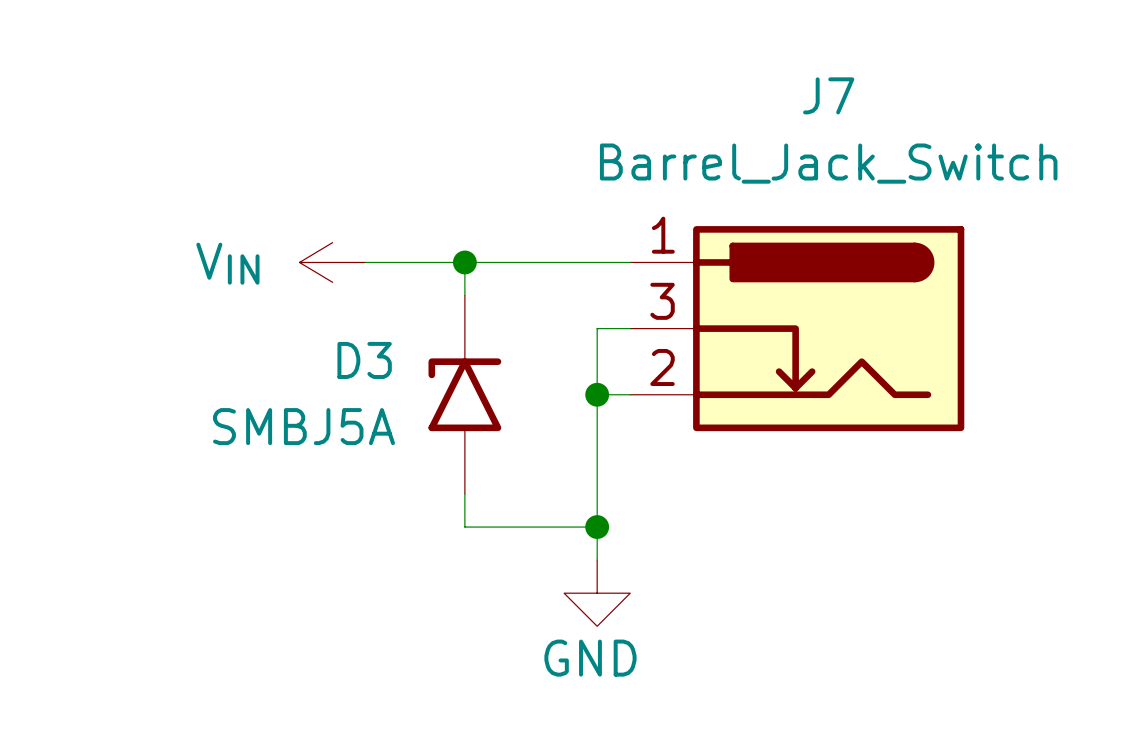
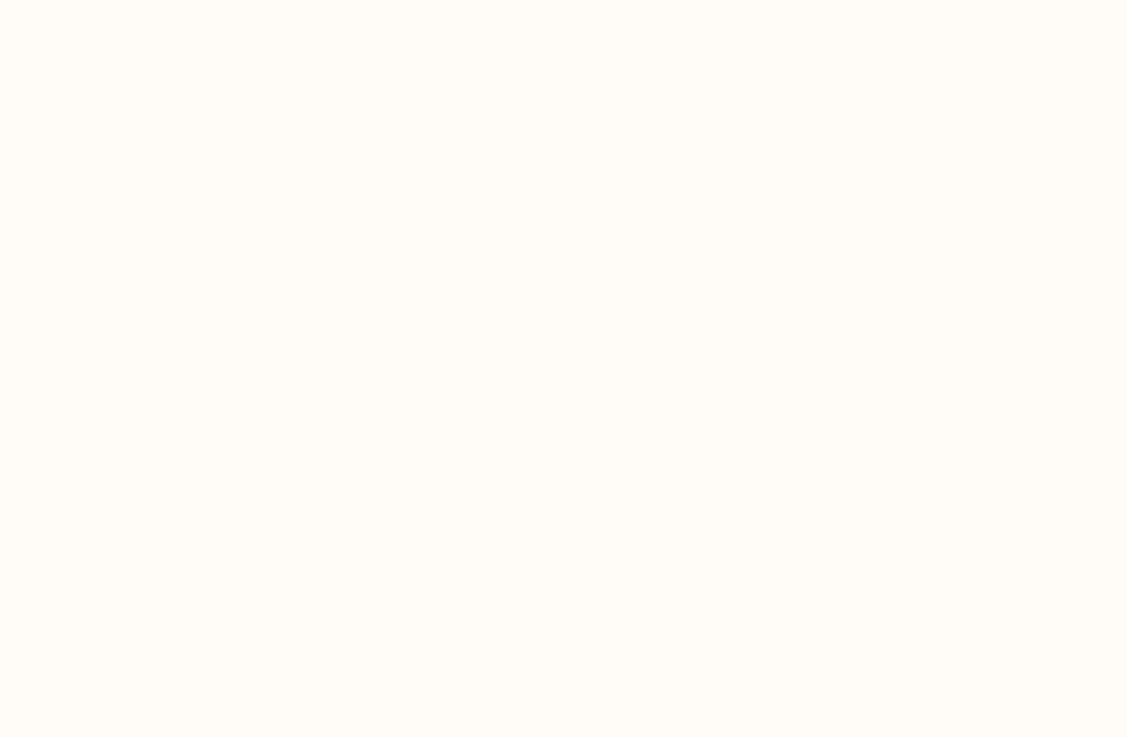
power symbol: VIN (332, 262) -> none
wire: (365, 262) (630, 262) -> none
wire: (464, 262) (464, 295) -> none
junction: (464, 262) -> none
wire: (630, 328) (597, 328) (597, 560) -> none
J7: Barrel_Jack_Switch (797, 328) -> none
D3: SMBJ5A (464, 394) -> none
wire: (597, 394) (630, 394) -> none
junction: (597, 394) -> none
wire: (464, 493) (464, 527) (597, 527) -> none
junction: (597, 527) -> none
power symbol: GND (597, 593) -> none

